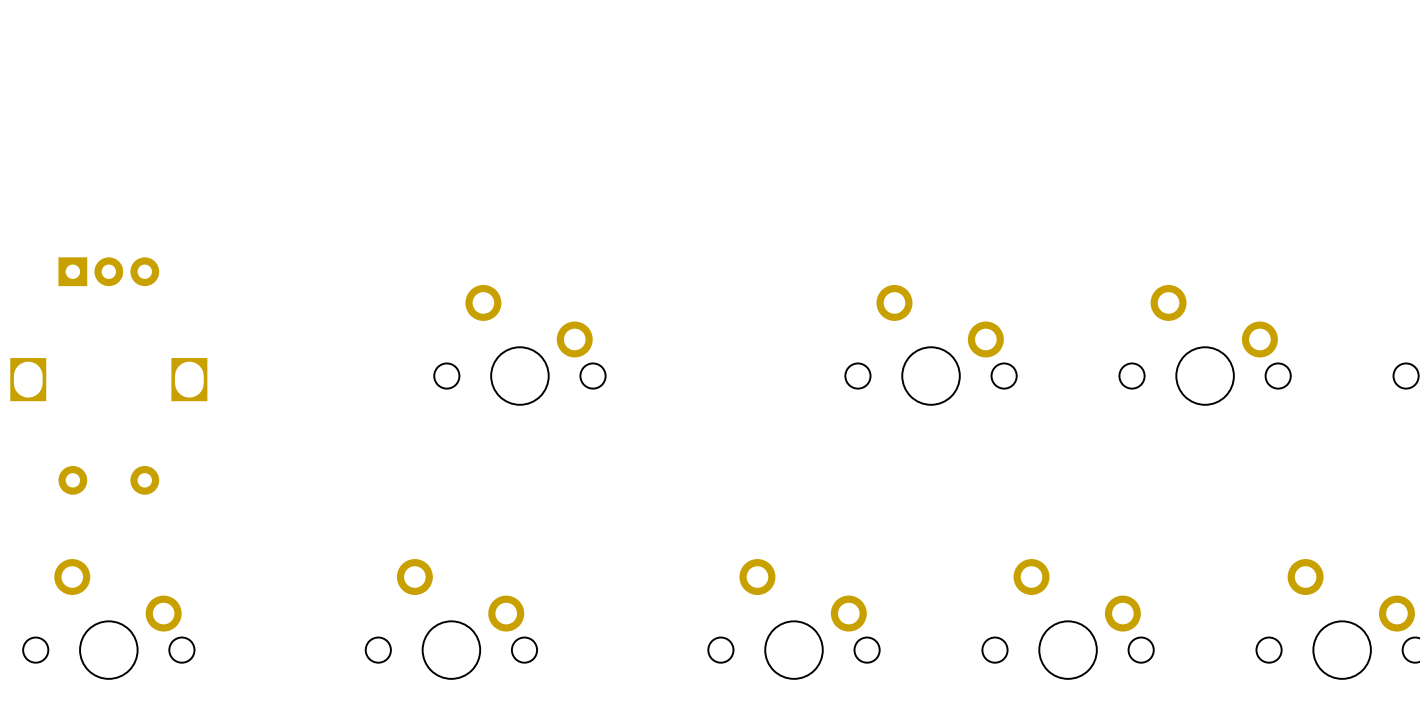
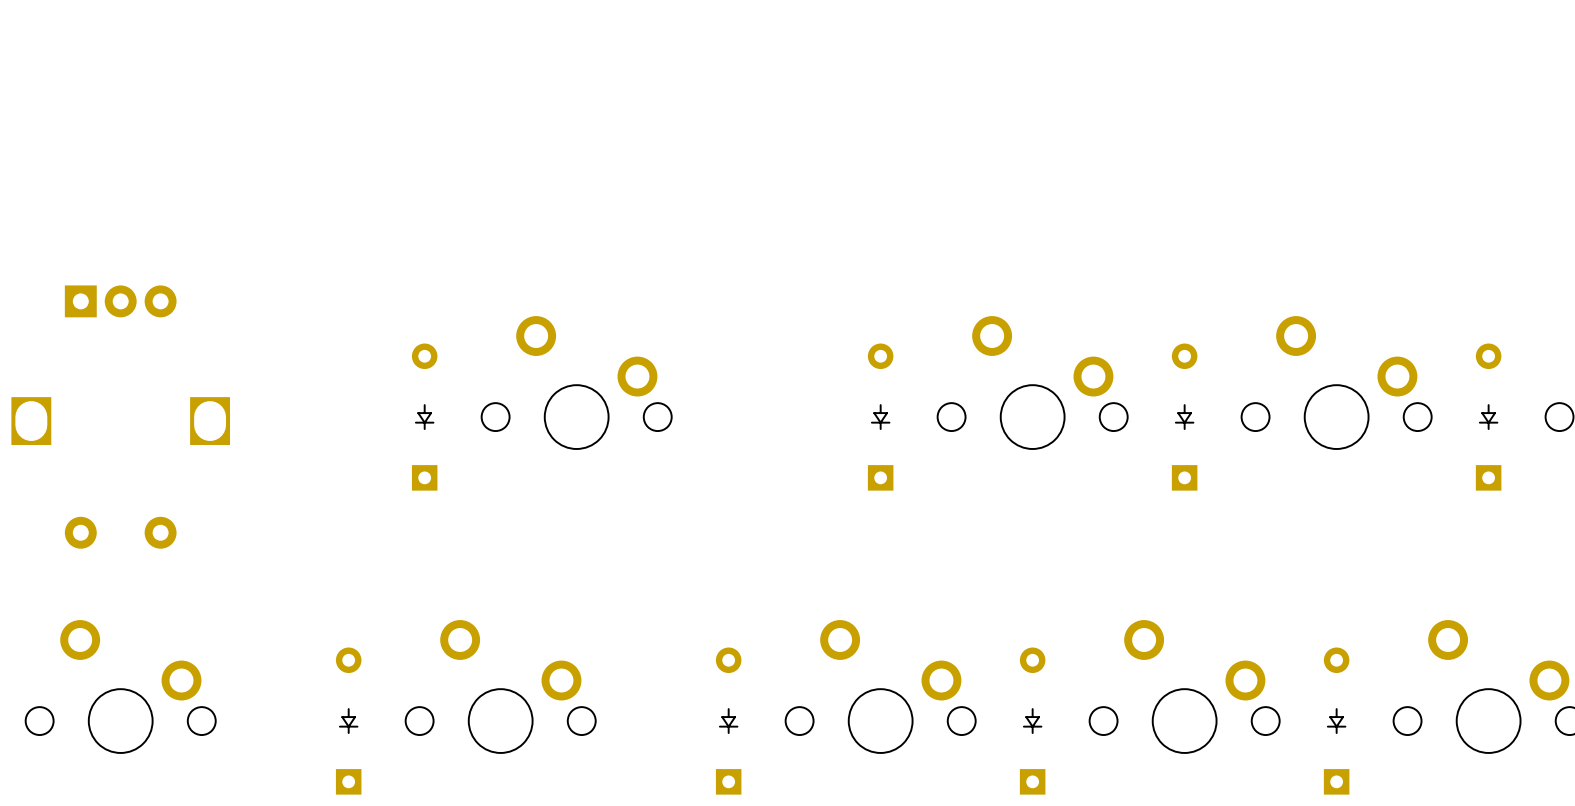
part: none -> (424, 417)
part: none -> (880, 417)
part: none -> (1184, 417)
part: none -> (1488, 417)
part: none -> (348, 721)
part: none -> (728, 721)
part: none -> (1032, 721)
part: none -> (1336, 721)

